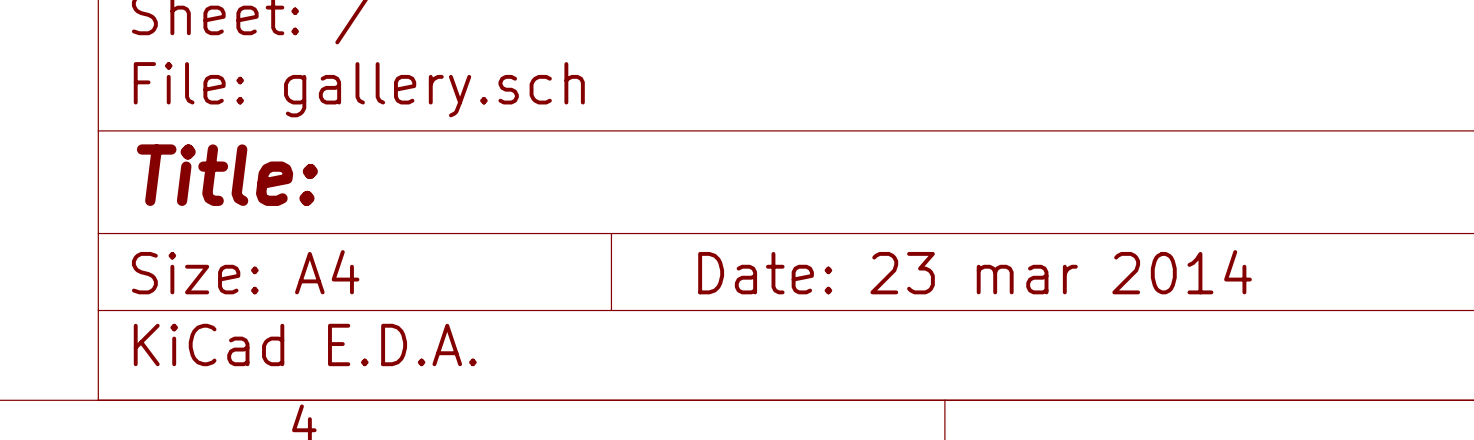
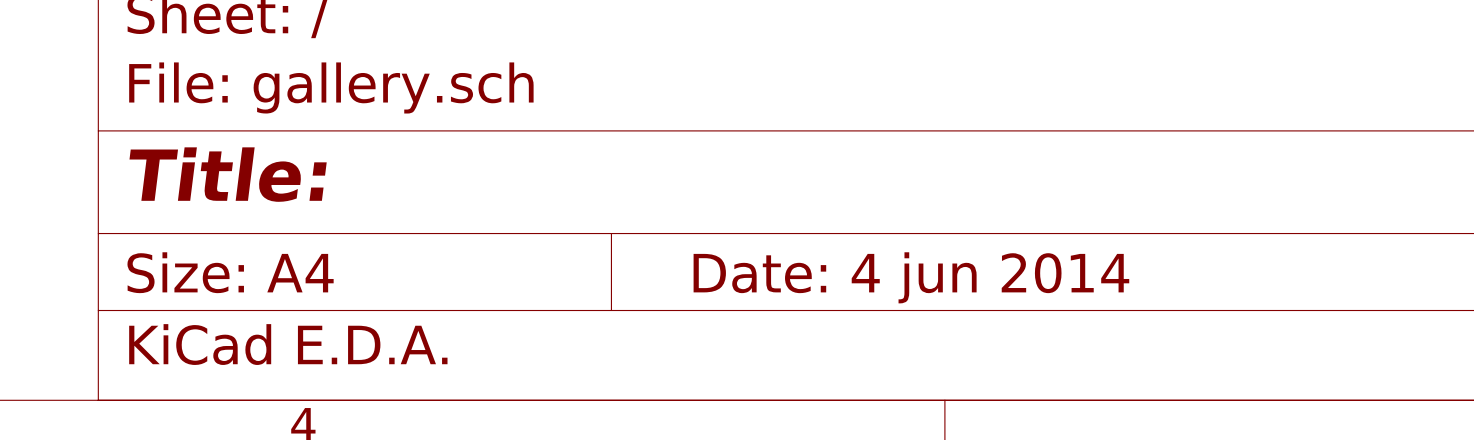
title block: Date: 23 mar 2014 (975, 272) -> Date: 4 jun 2014 (911, 277)

